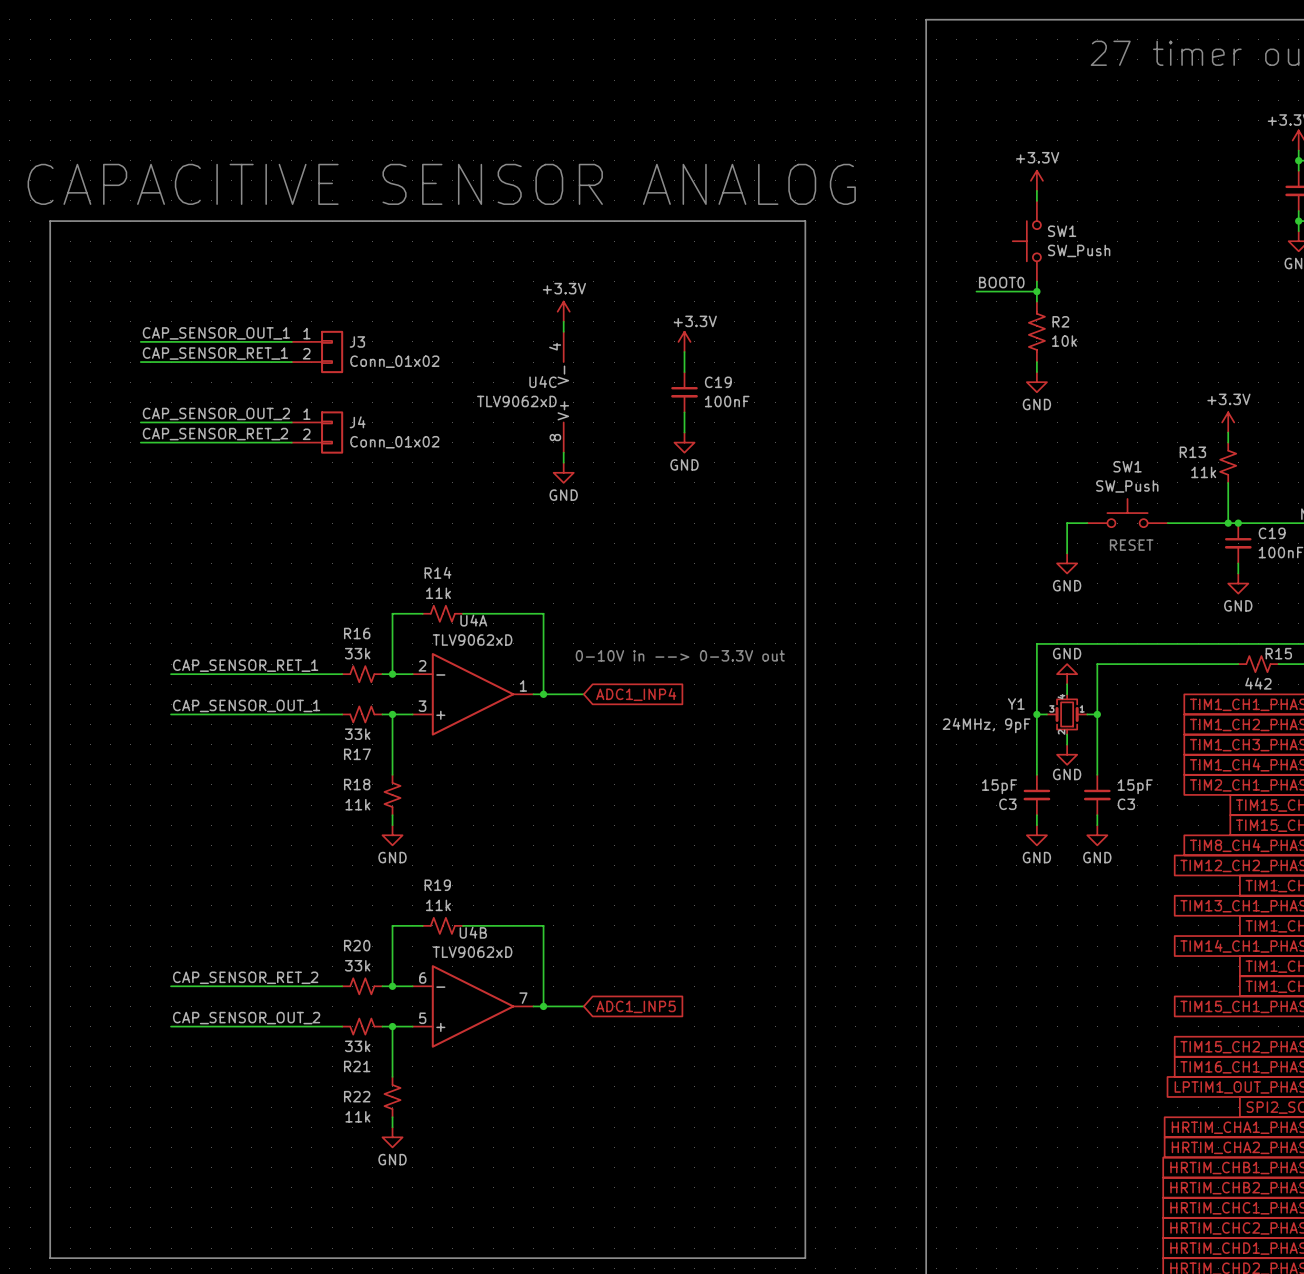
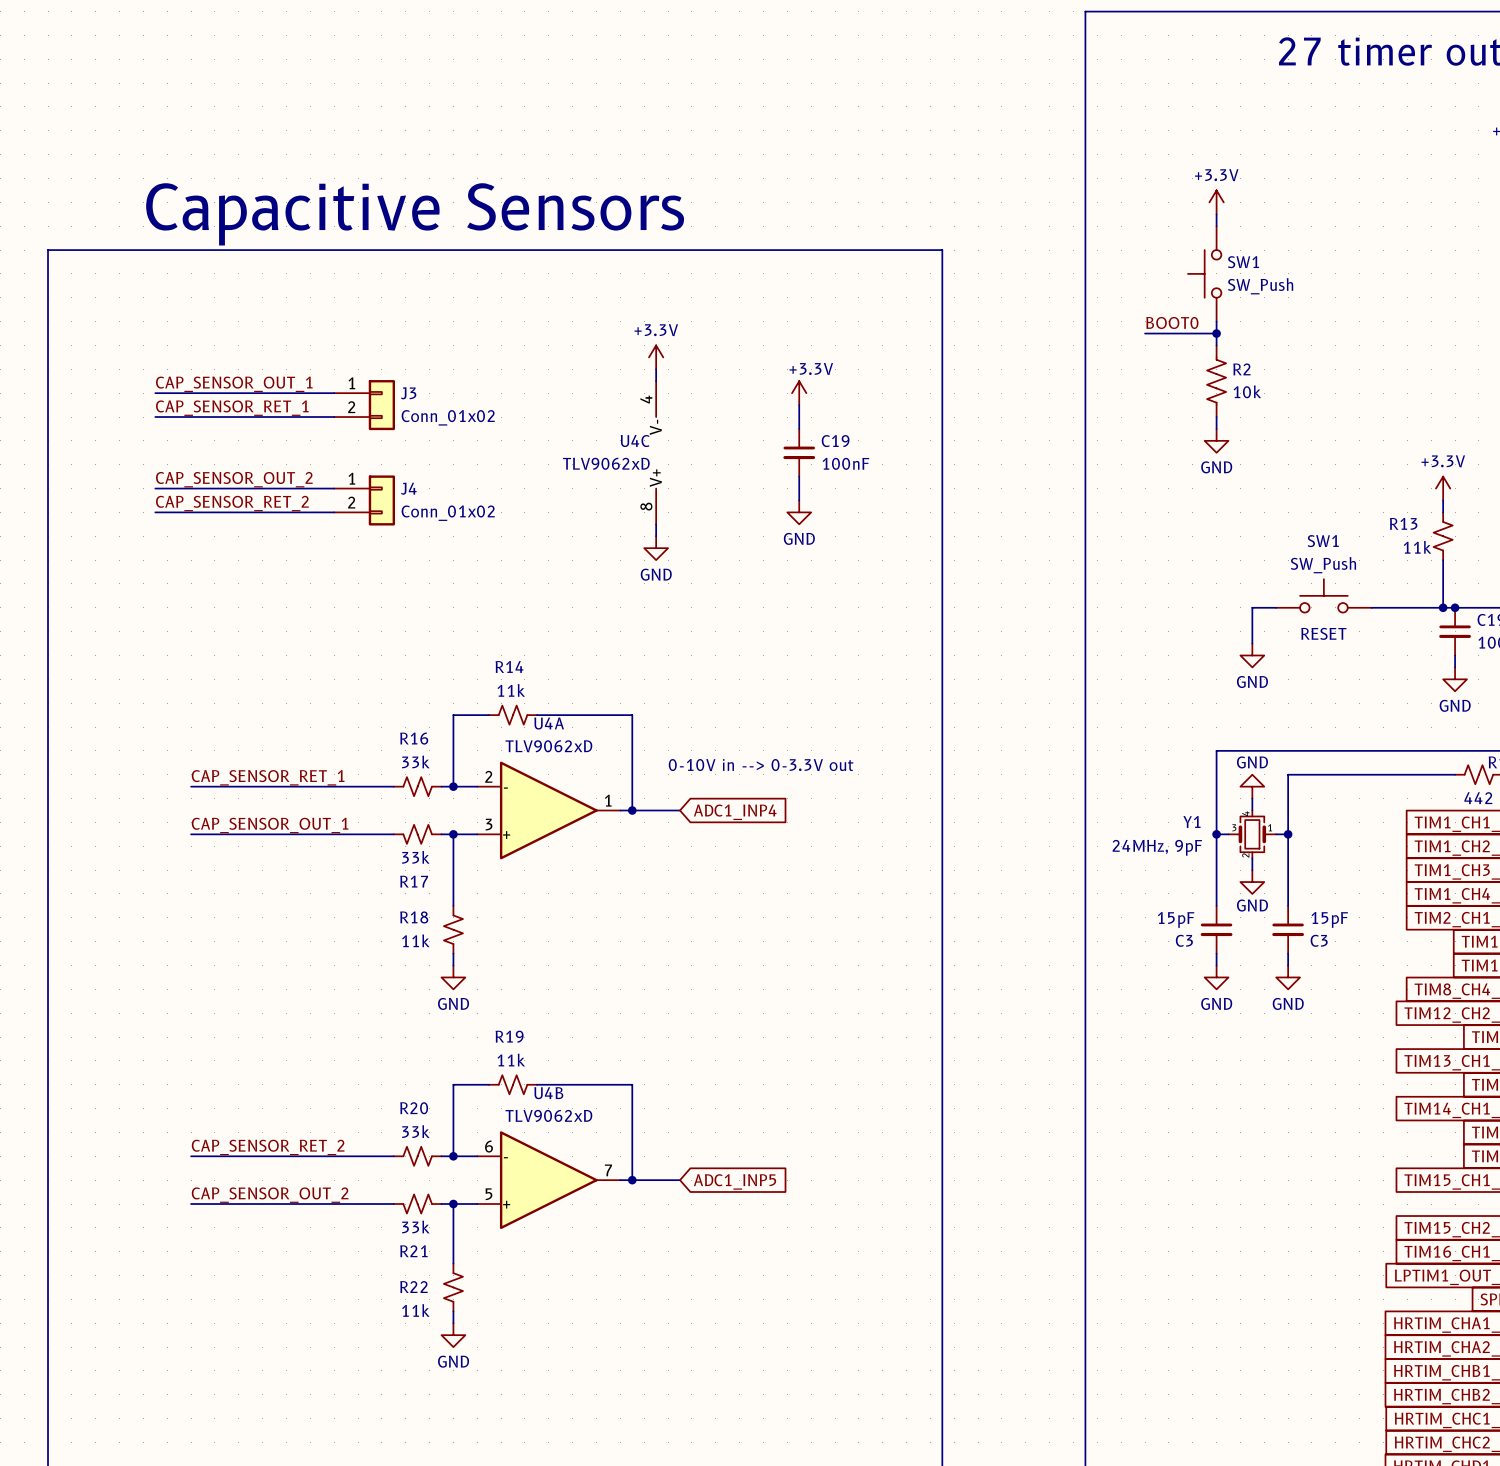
text: CAPACITIVE SENSOR ANALOG (441, 184) -> none
text: none -> Capacitive Sensors (415, 214)

